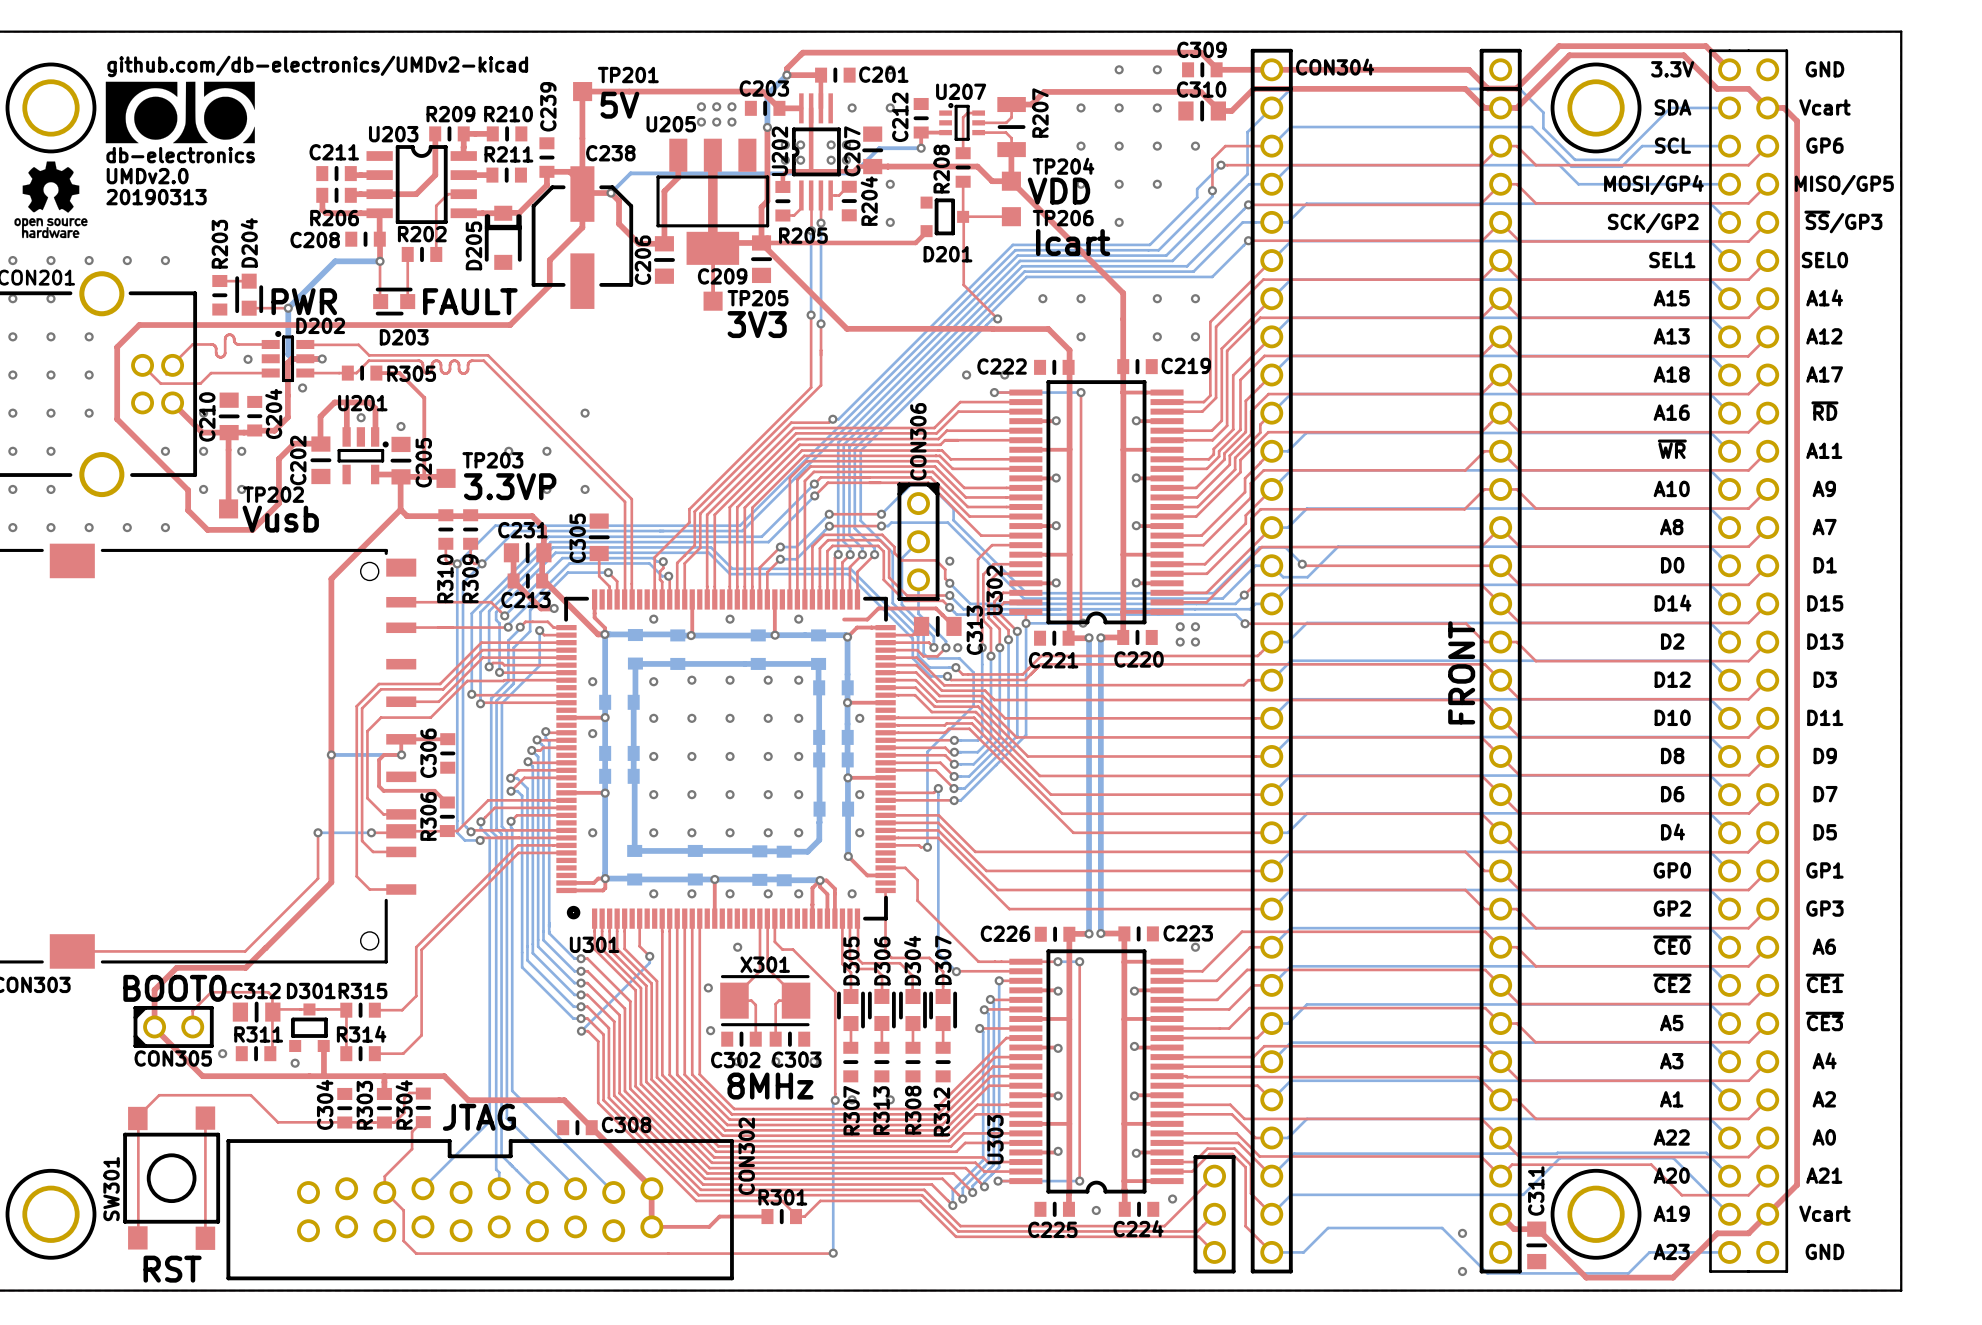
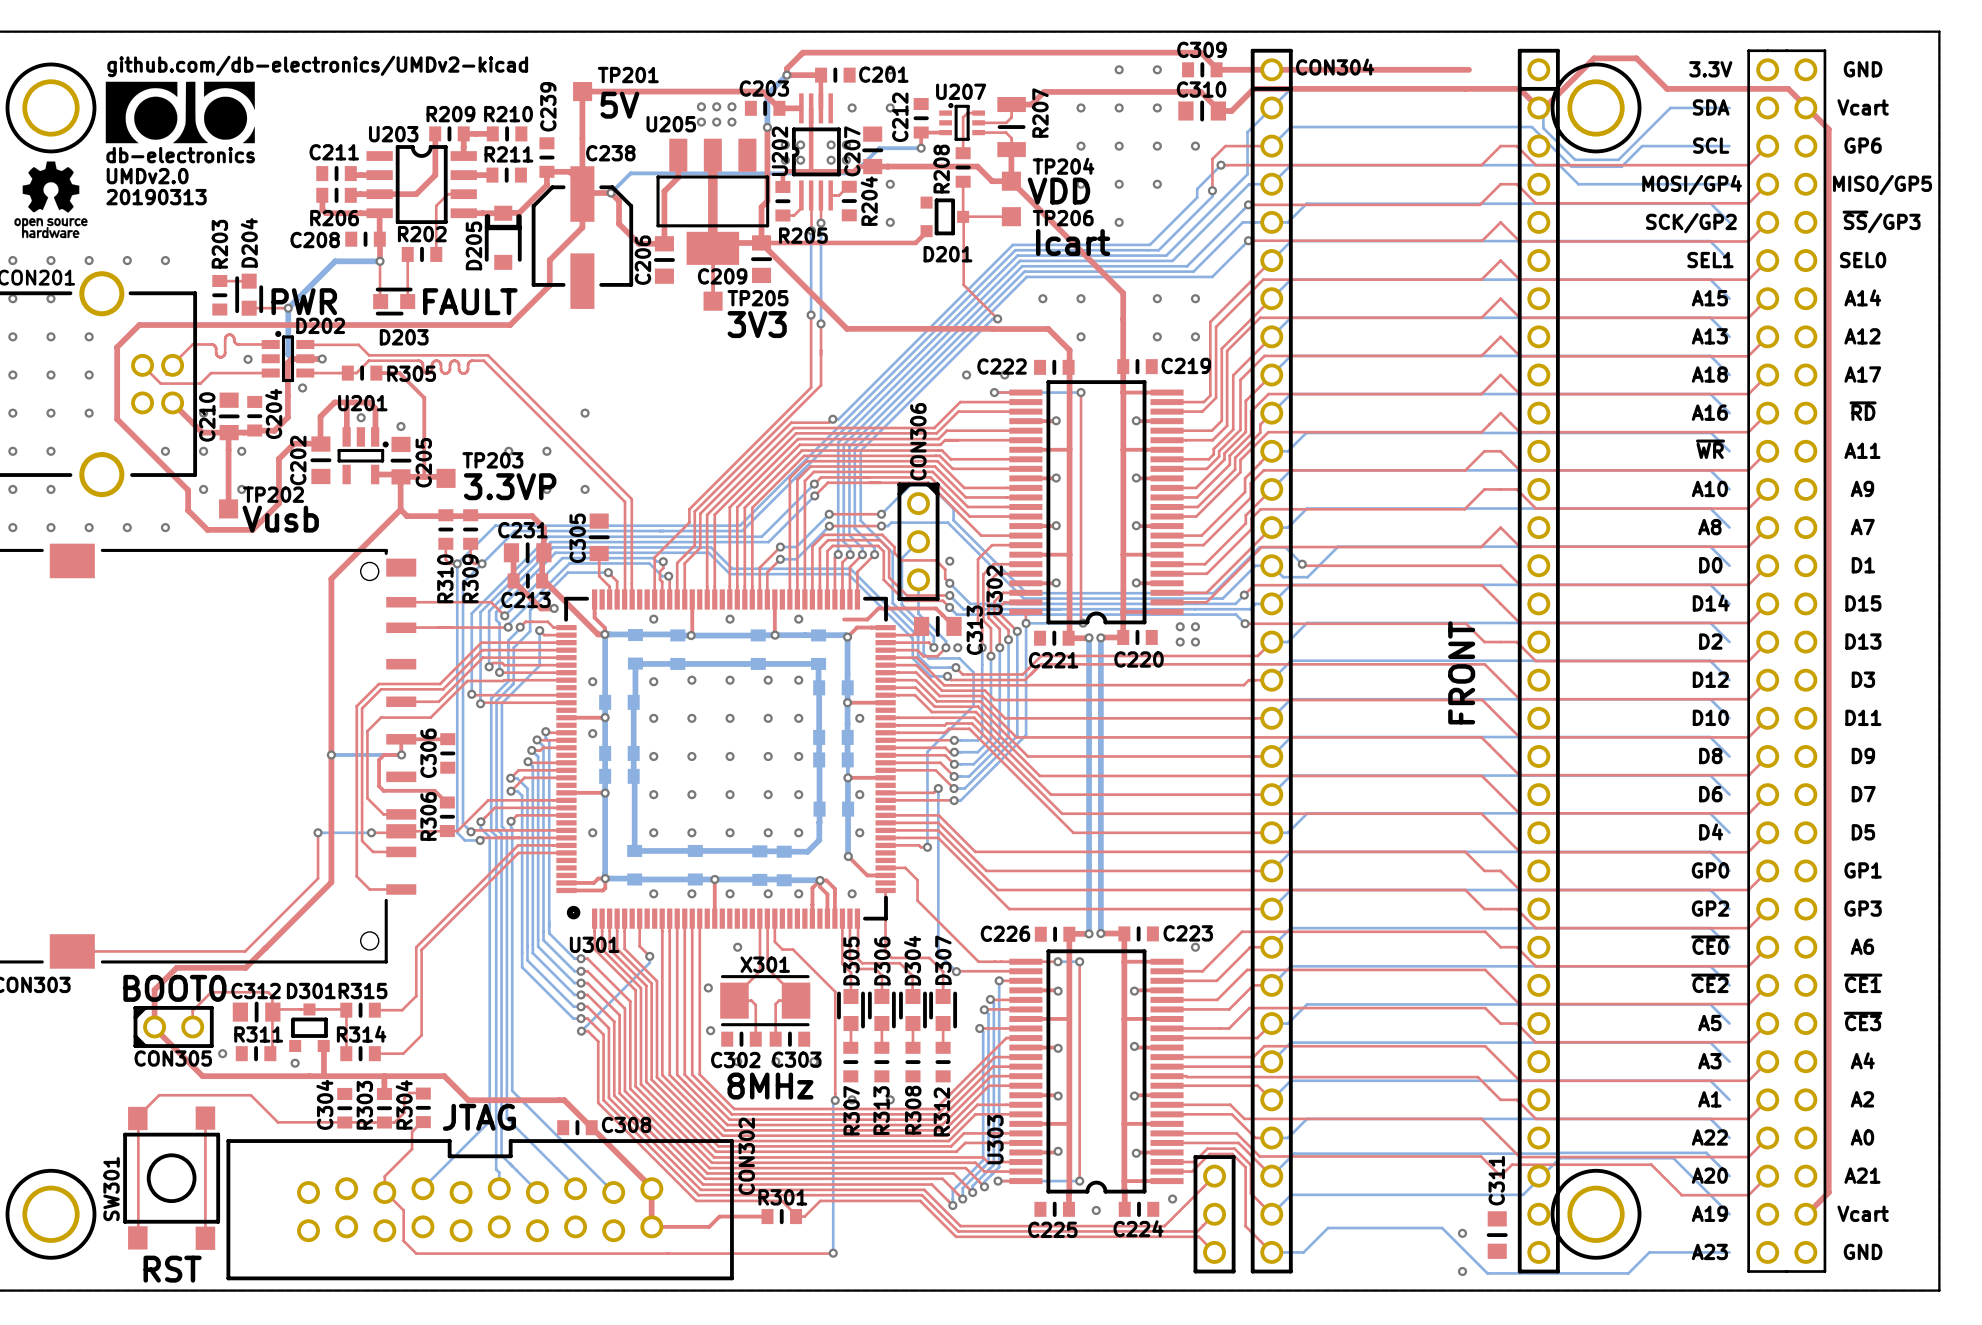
board edge: (1901, 31) (1901, 1290) -> (1901, 31) (1939, 31) (1939, 1290) (1901, 1290)
CON304 footprint: [1193, 48, 1789, 1274] -> [1193, 48, 1827, 1274]
top track: (1469, 69) (1487, 88) (1516, 88) (1559, 46) (1705, 46) (1729, 69) -> none
top track: (1465, 88) (1484, 107) (1516, 107) (1569, 55) (1683, 55) (1717, 88) -> (1465, 88) (1519, 88) (1538, 107) (1544, 107) (1594, 58) (1636, 58) (1666, 88) (1717, 88)
top track: (1748, 88) (1767, 107) (1783, 107) (1797, 121) (1797, 1184) (1748, 1233) (1717, 1233) (1673, 1277) (1586, 1277) (1537, 1228) (1514, 1229) (1501, 1216) -> (1748, 88) (1788, 88) (1828, 129) (1828, 1192) (1806, 1215)
C311 position: (1536, 1245) -> (1497, 1235)

